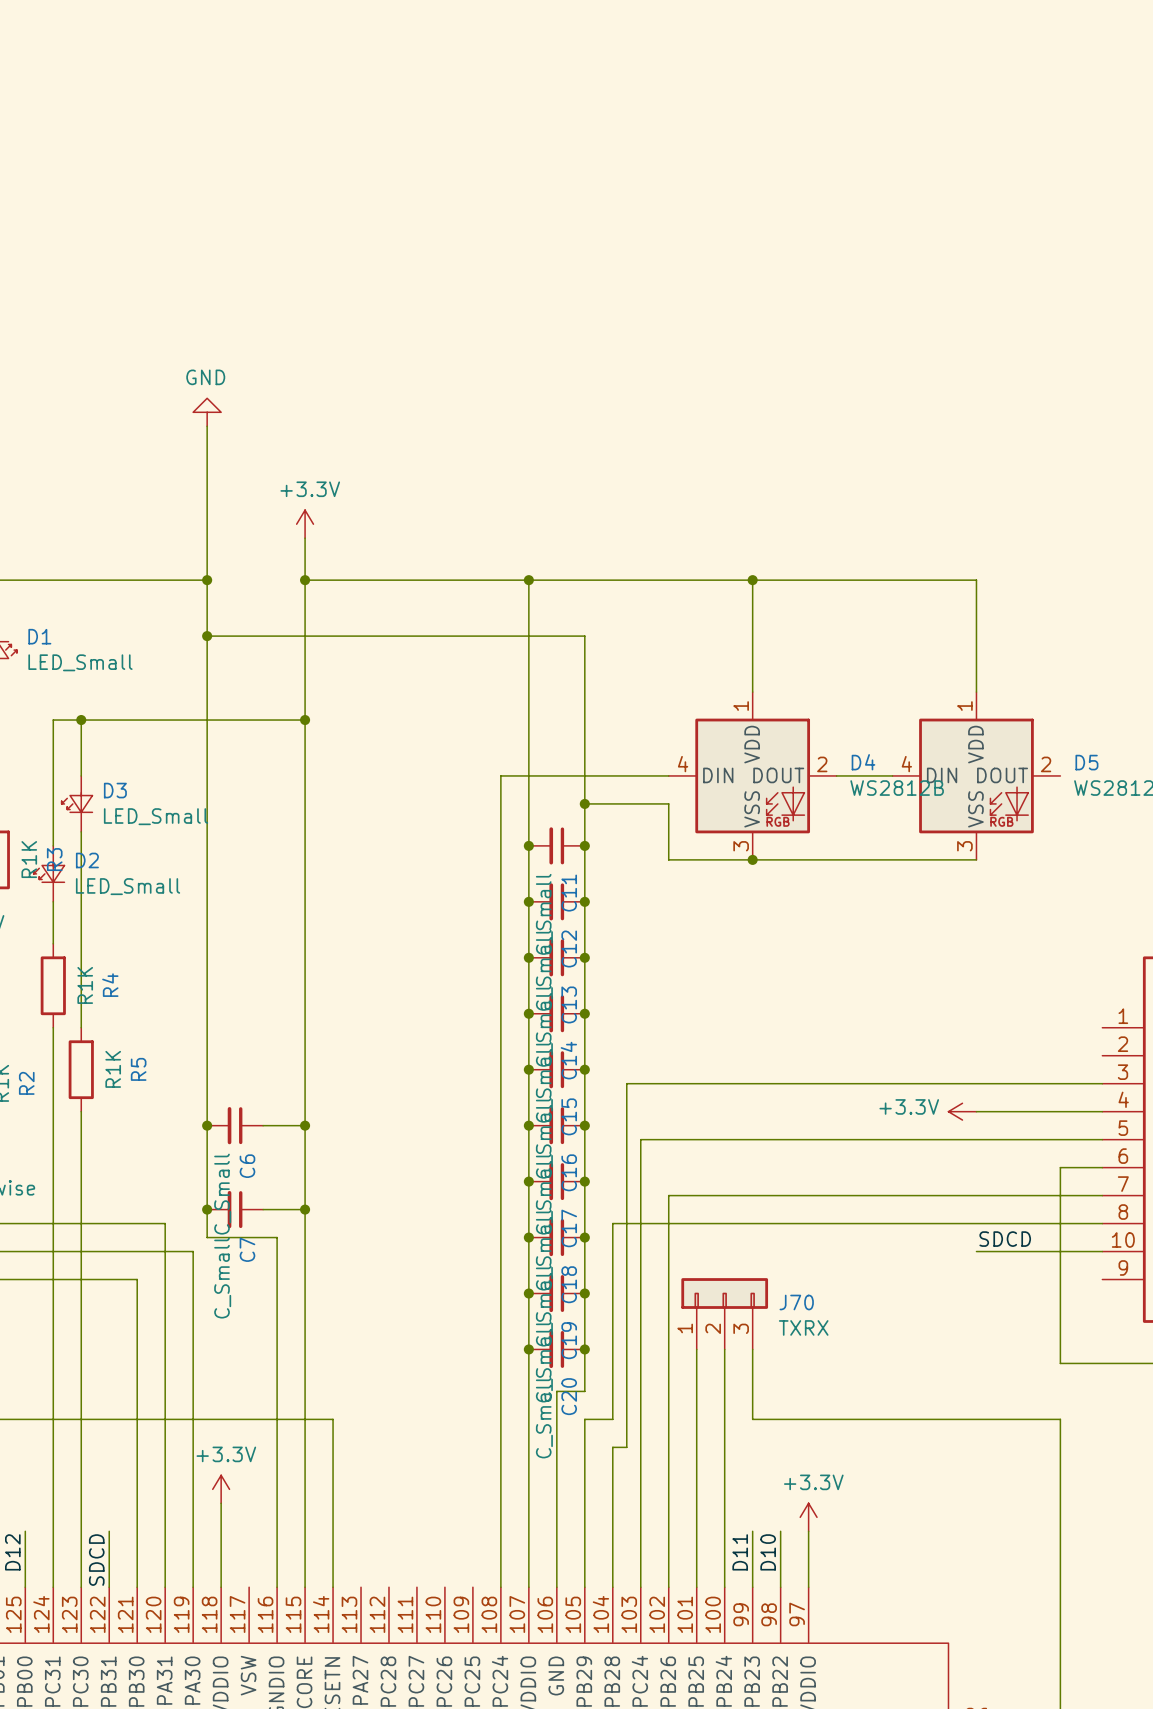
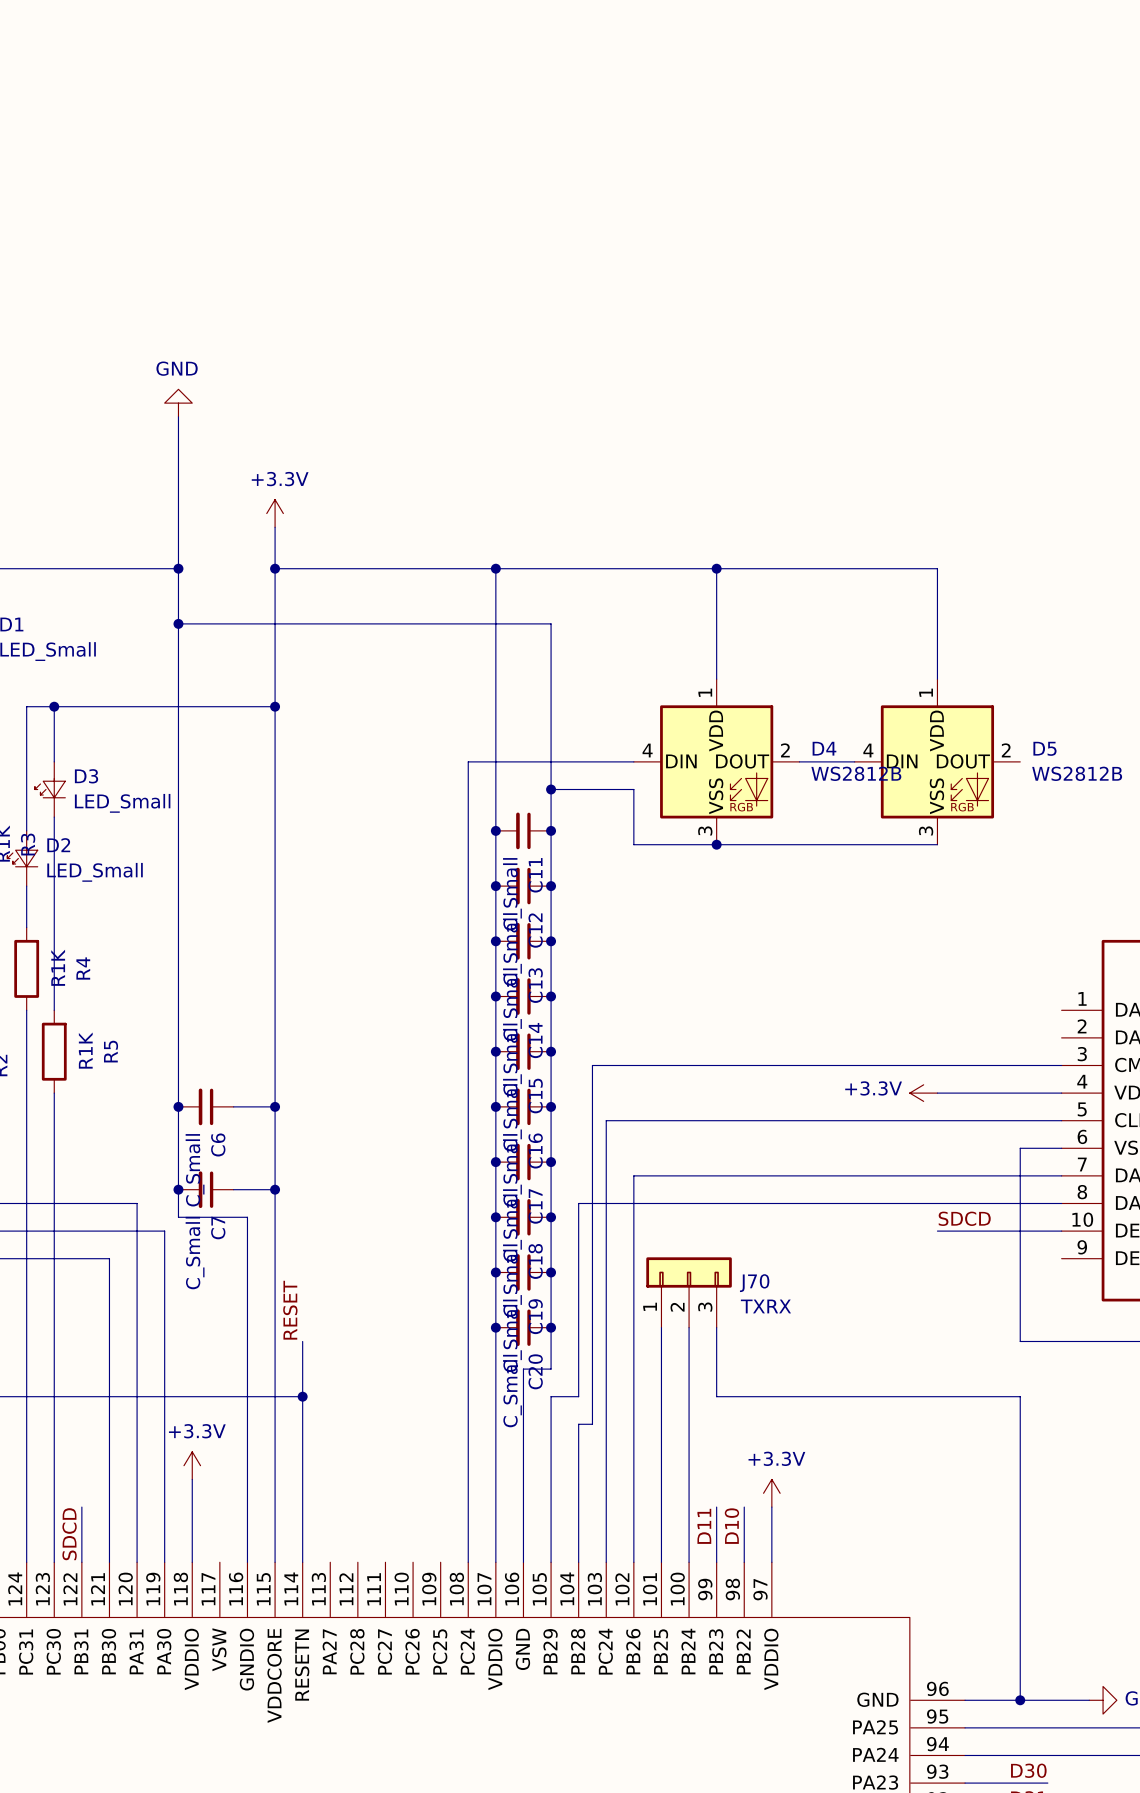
label: none -> RESET (290, 1310)
wire: none -> (302, 1341) (302, 1396)
junction: none -> (302, 1396)

